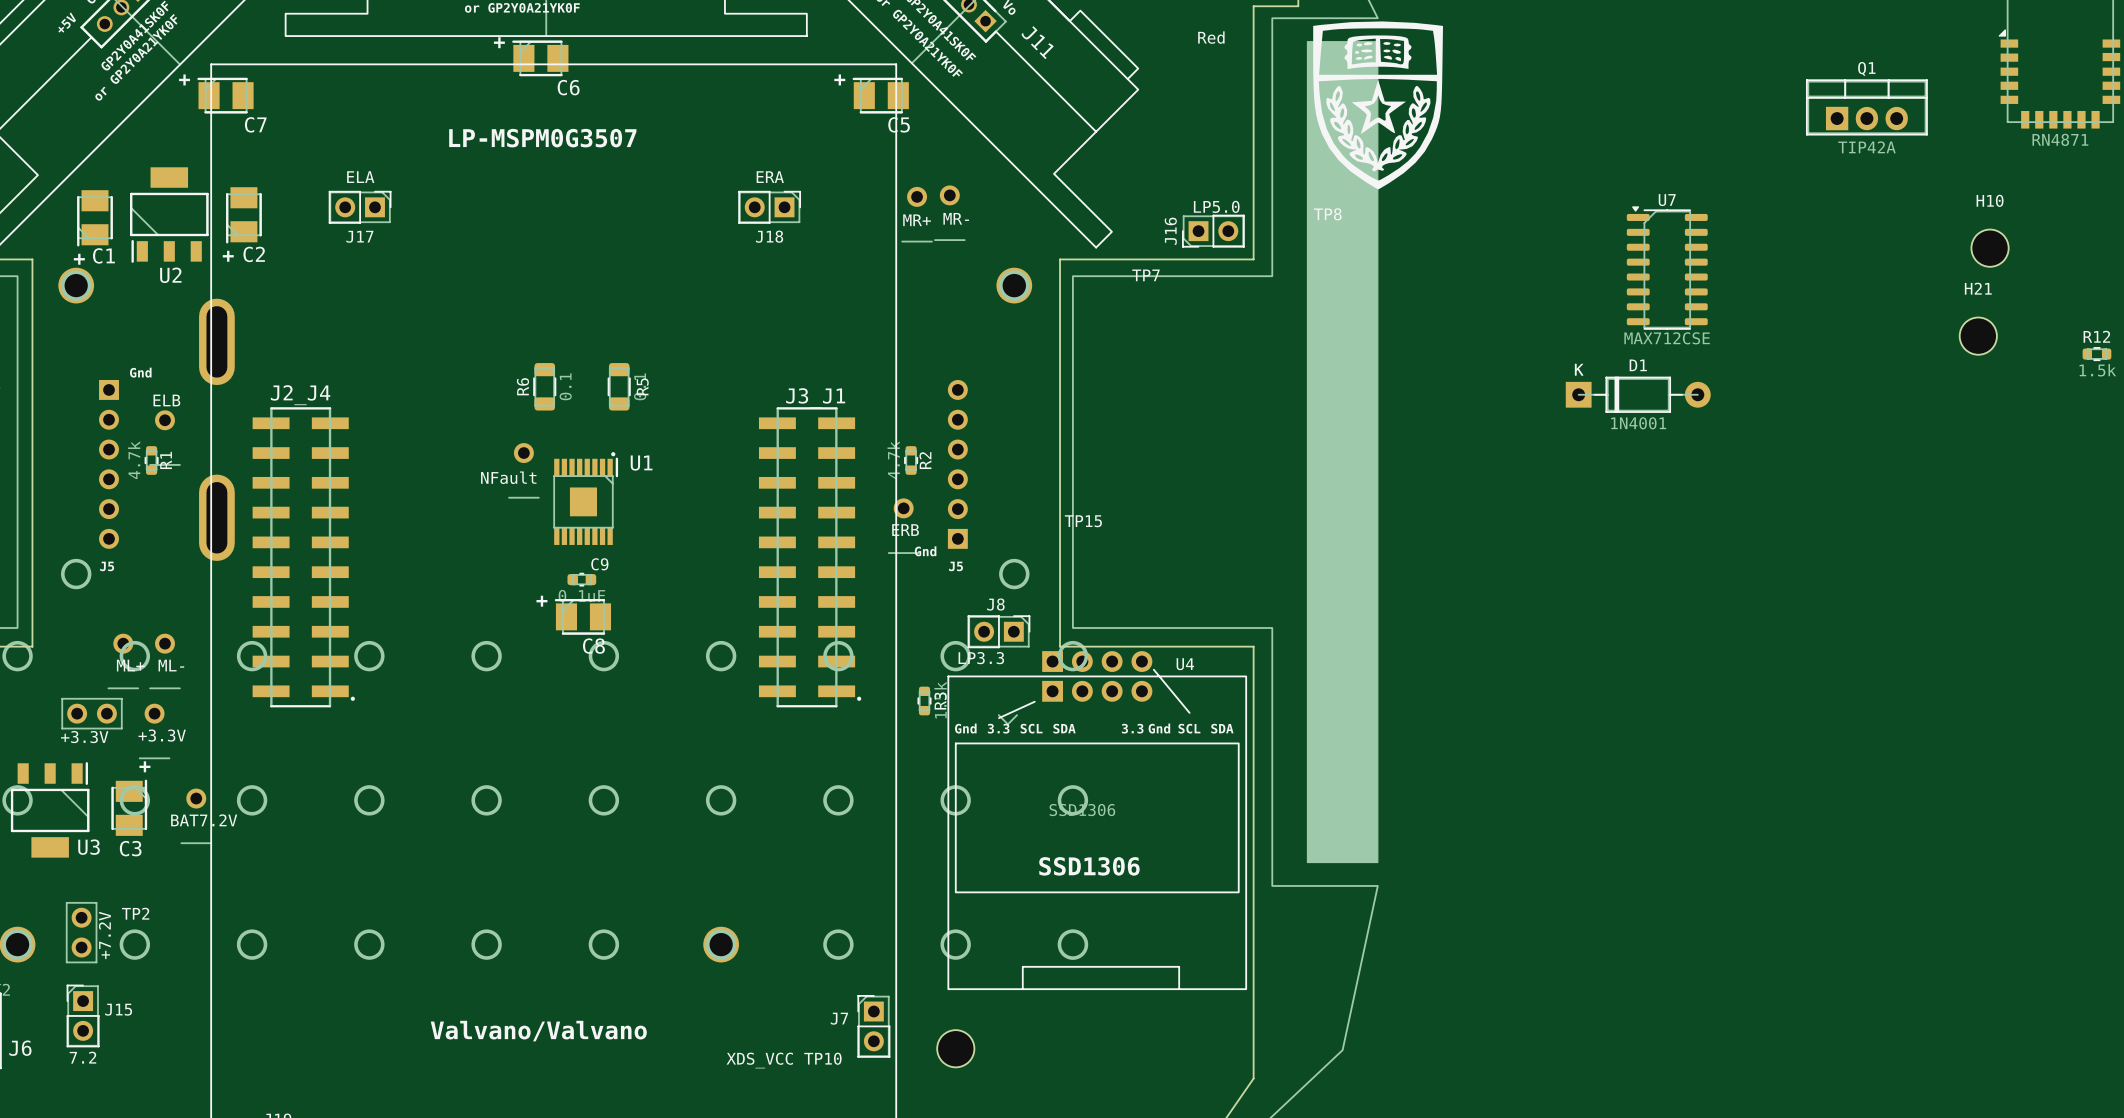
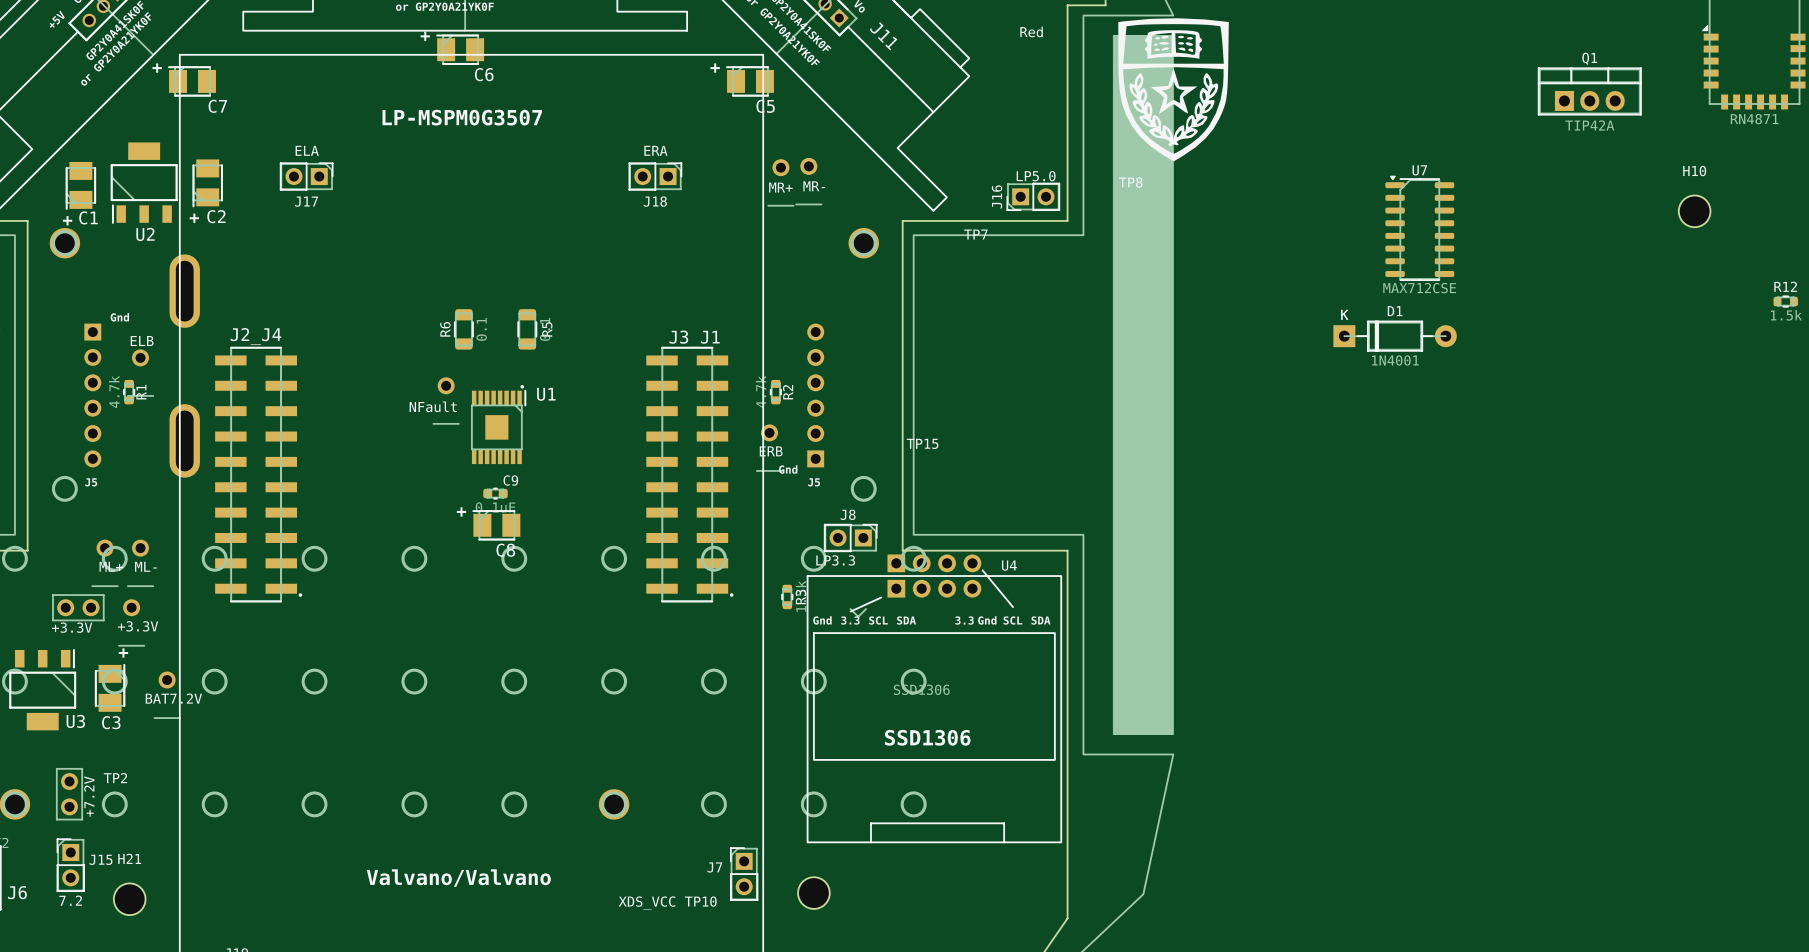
H21 position: (1978, 336) -> (129, 899)

